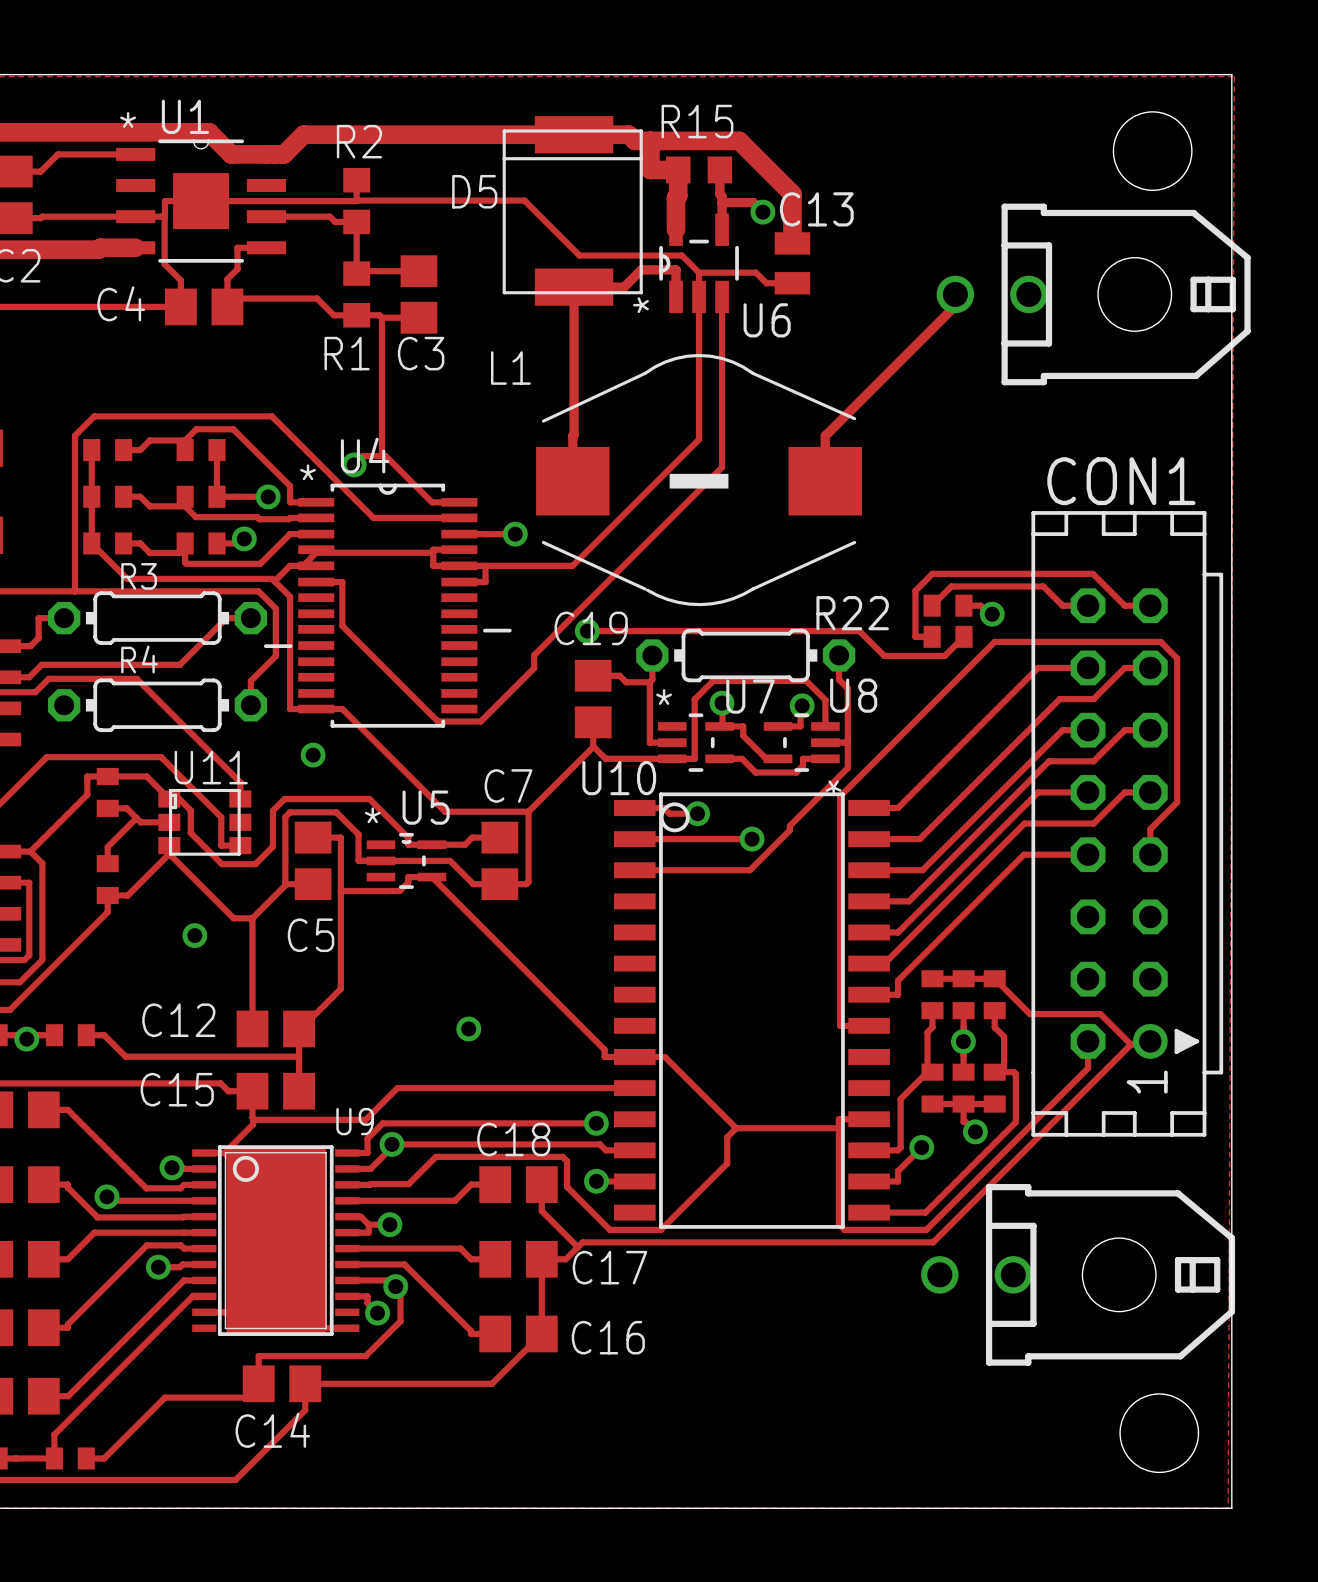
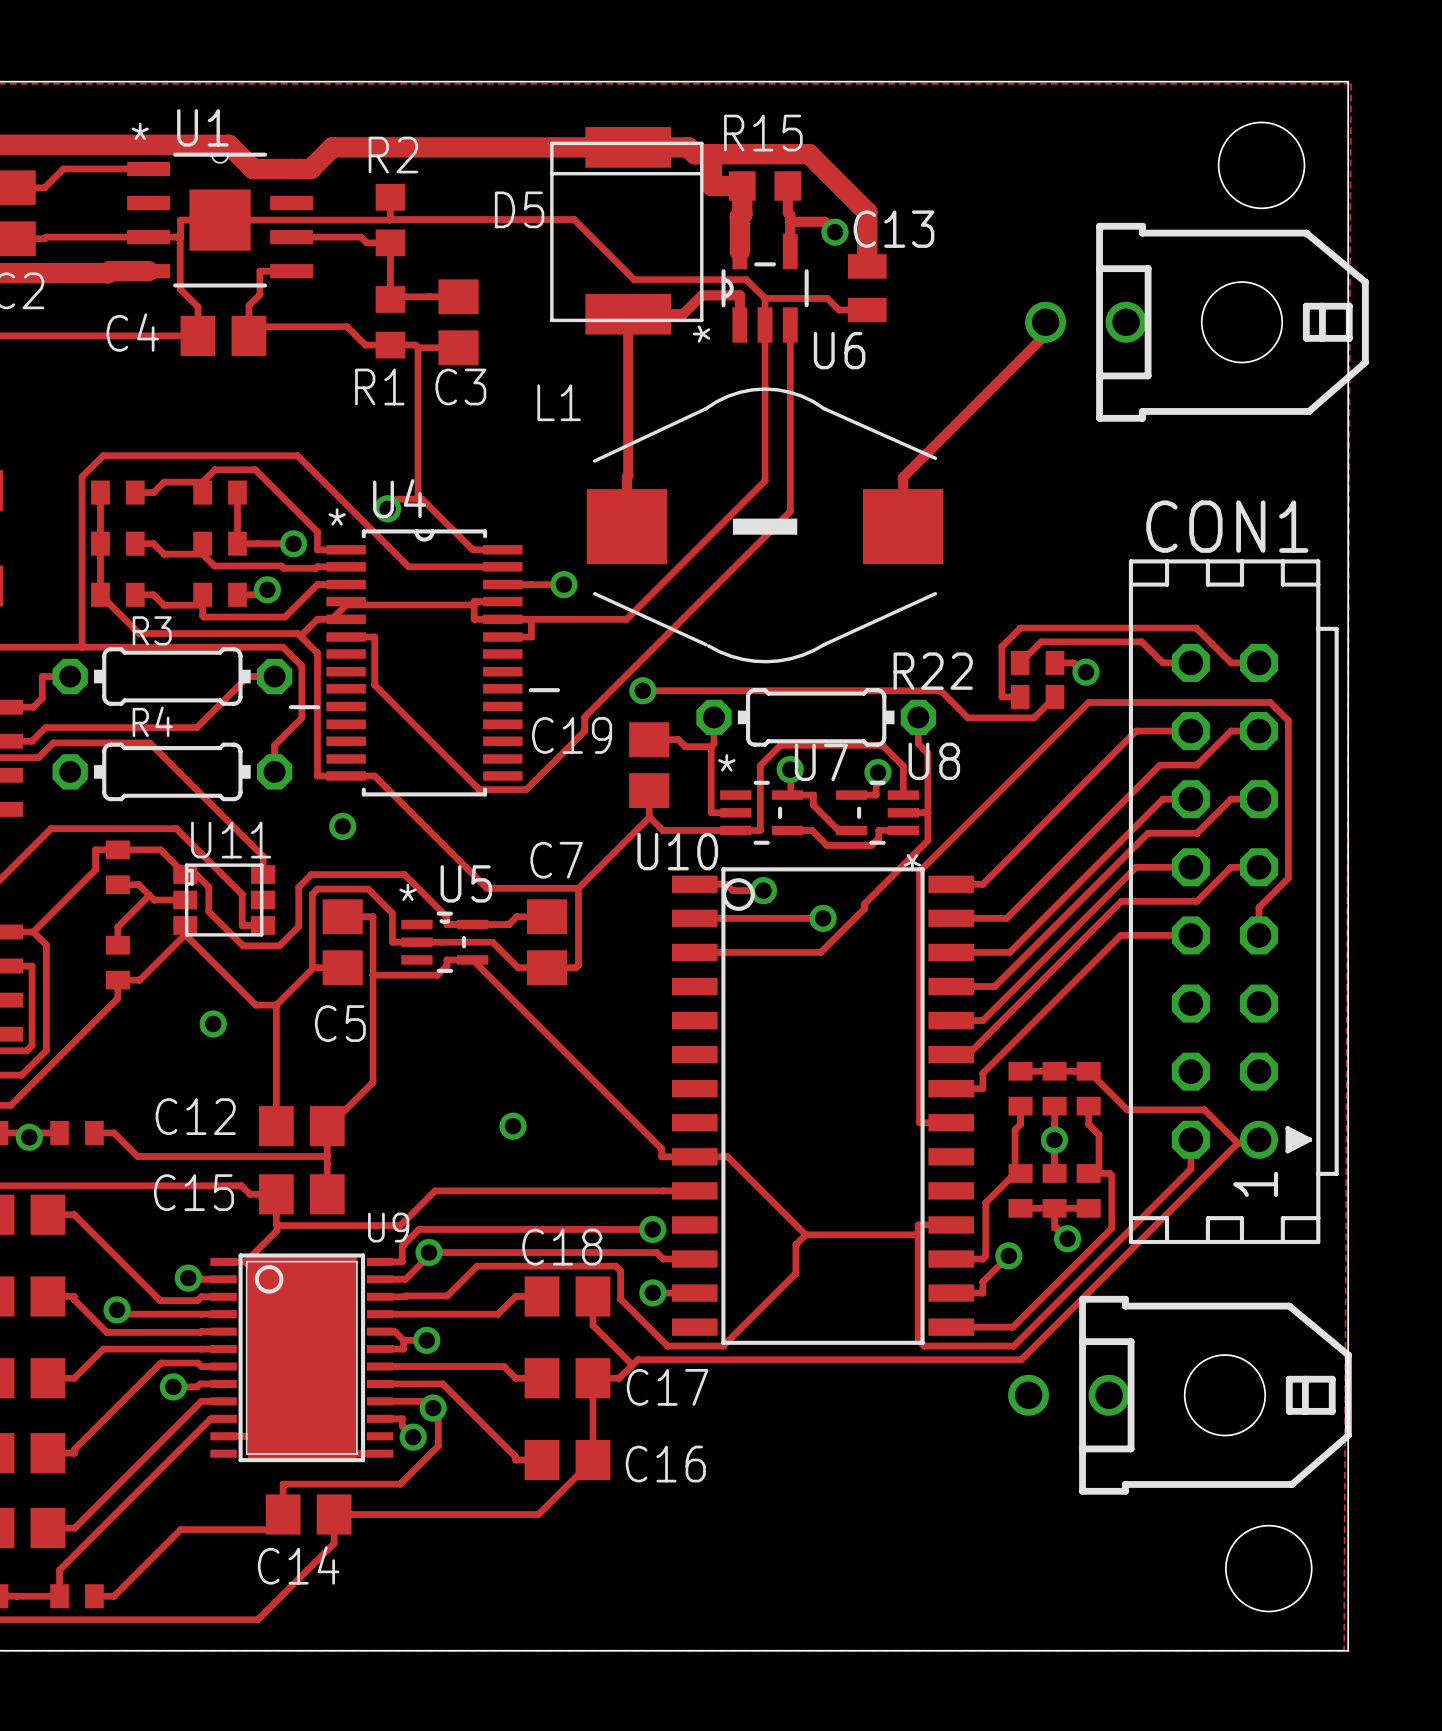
C19 name position: C19 (591, 628) -> C19 (572, 735)

